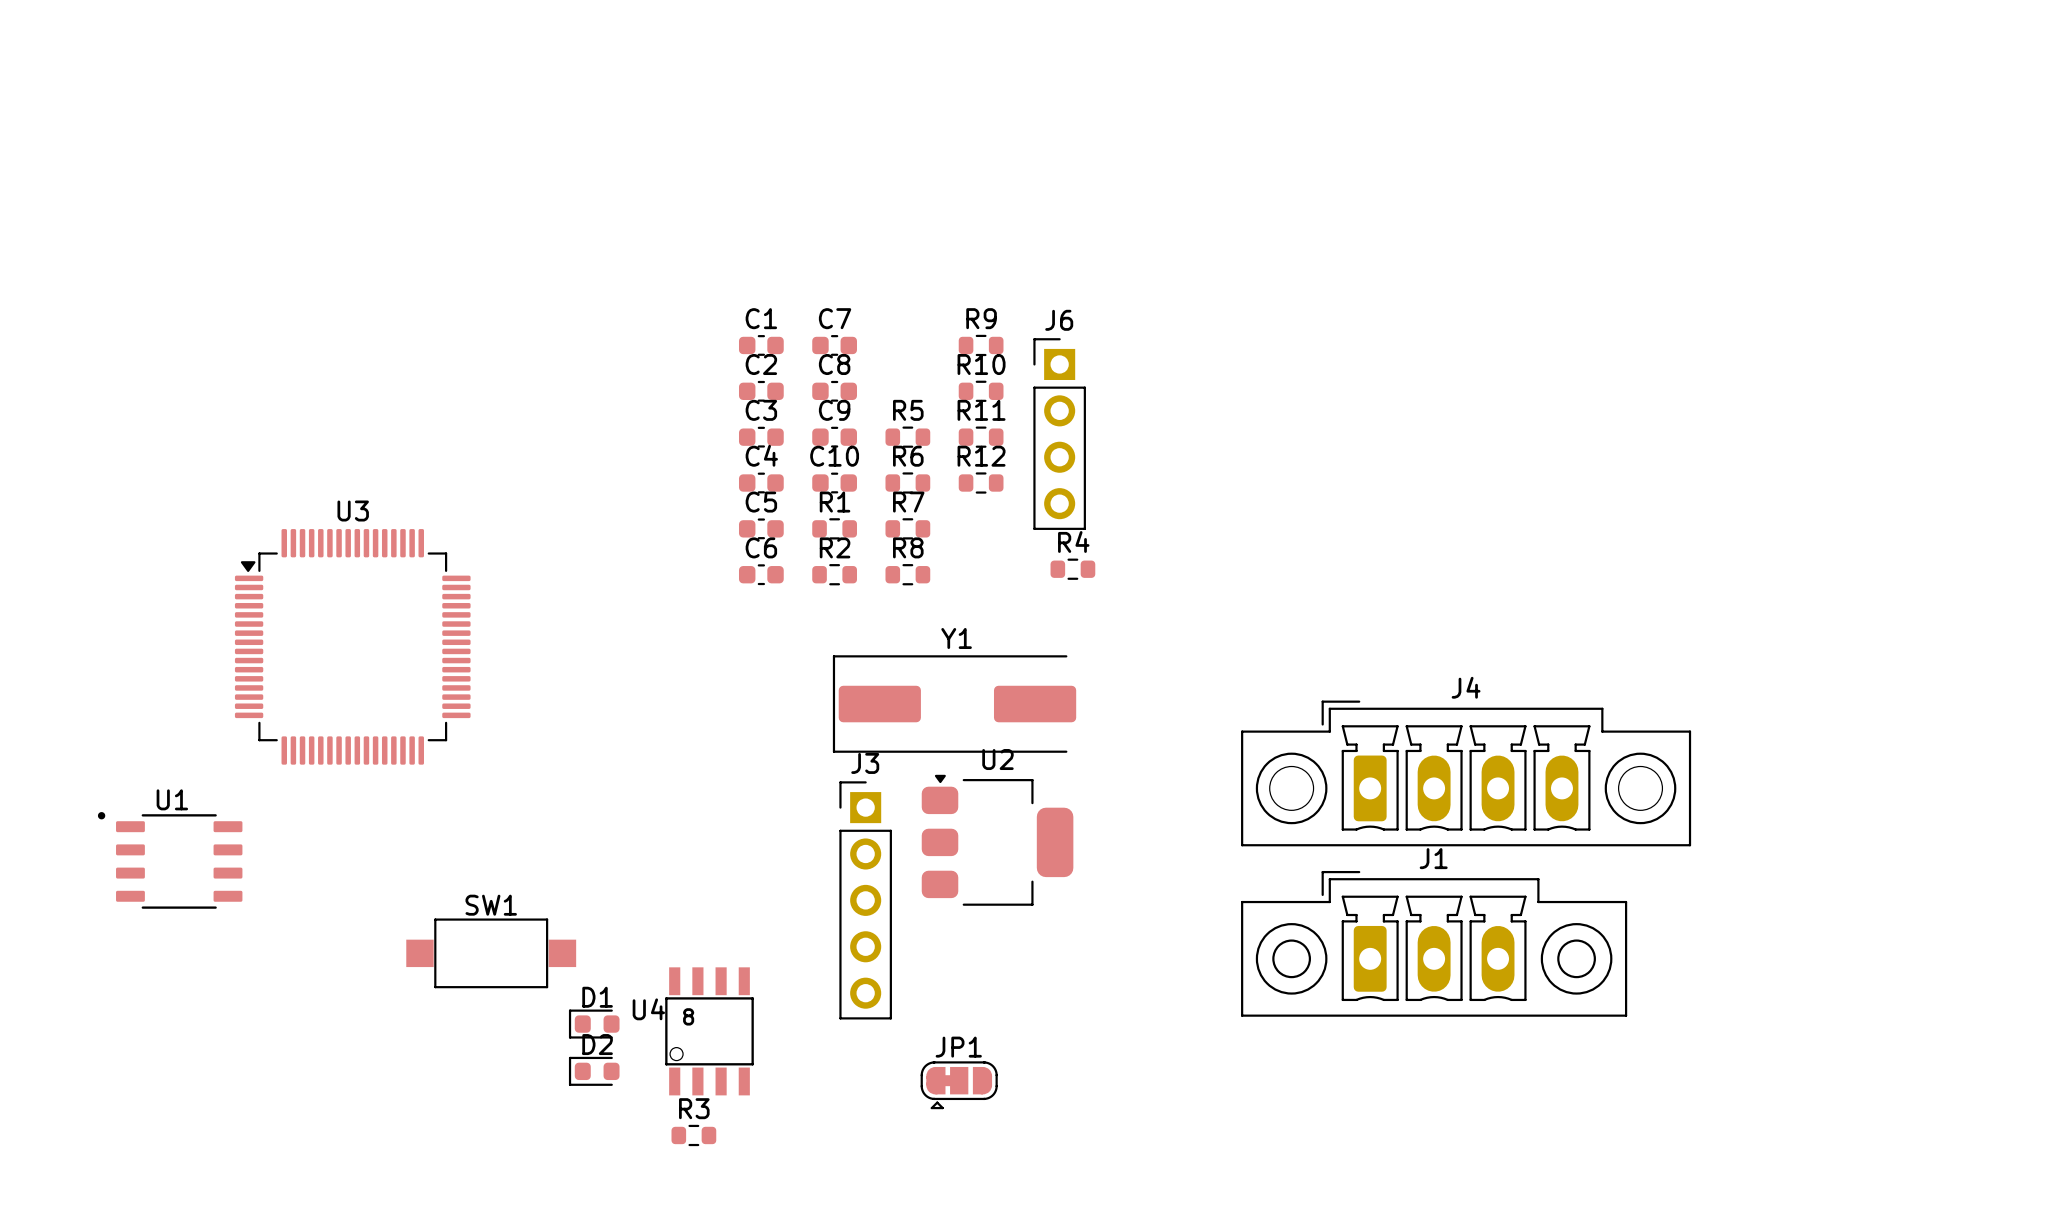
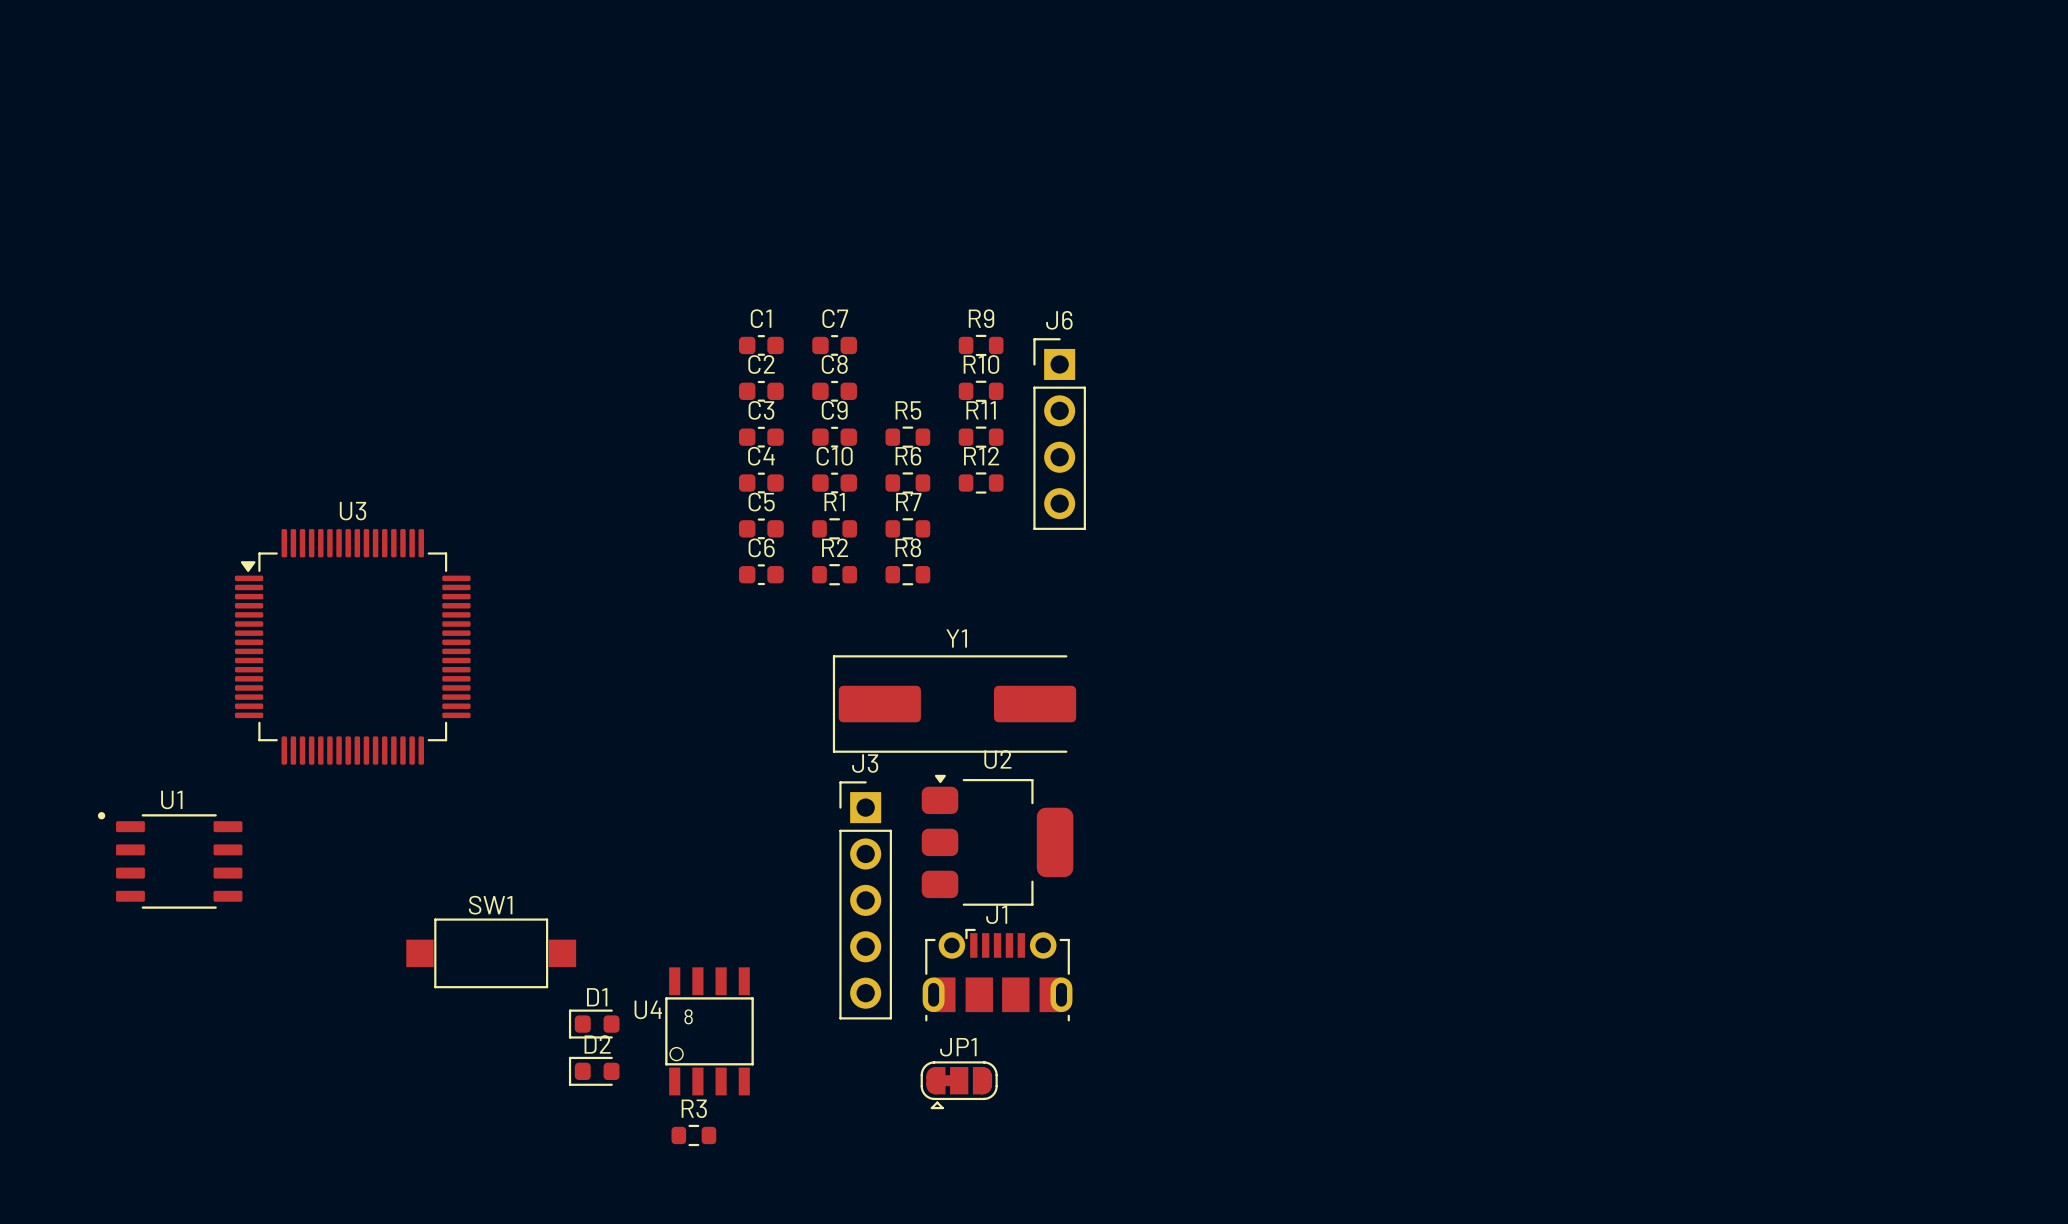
R4: (1072, 569) -> none
J4: (1466, 773) -> none
J1 footprint: [1241, 870, 1628, 1017] -> [922, 928, 1073, 1022]

